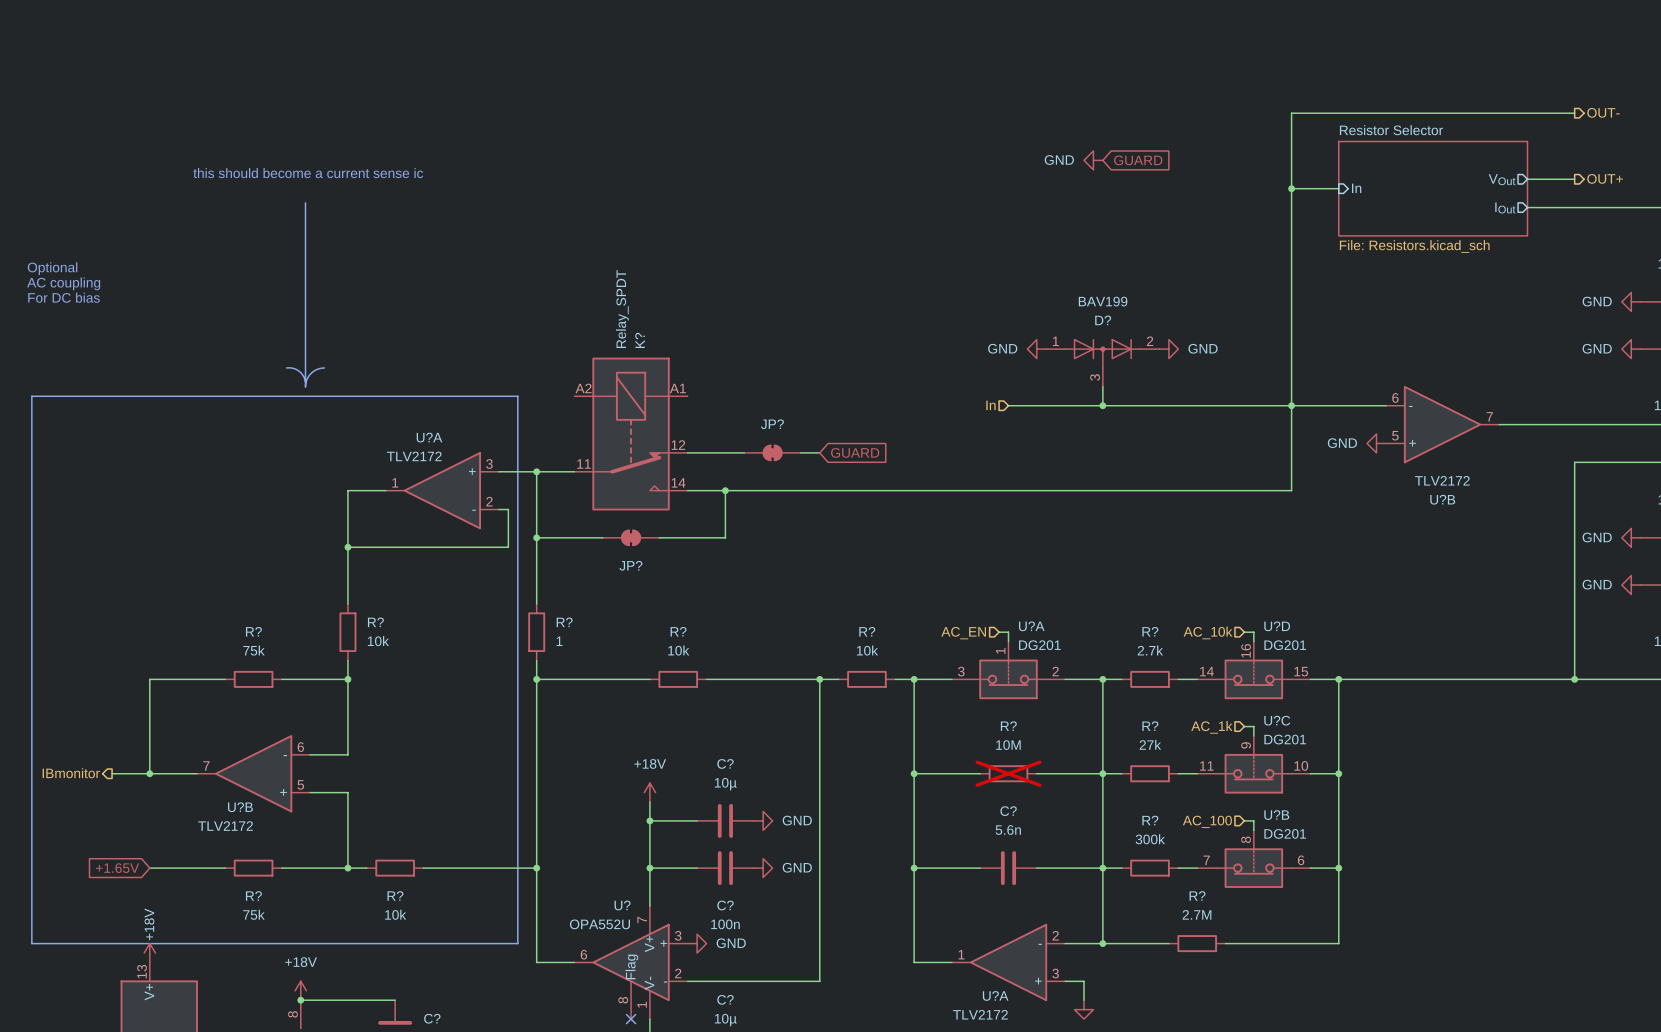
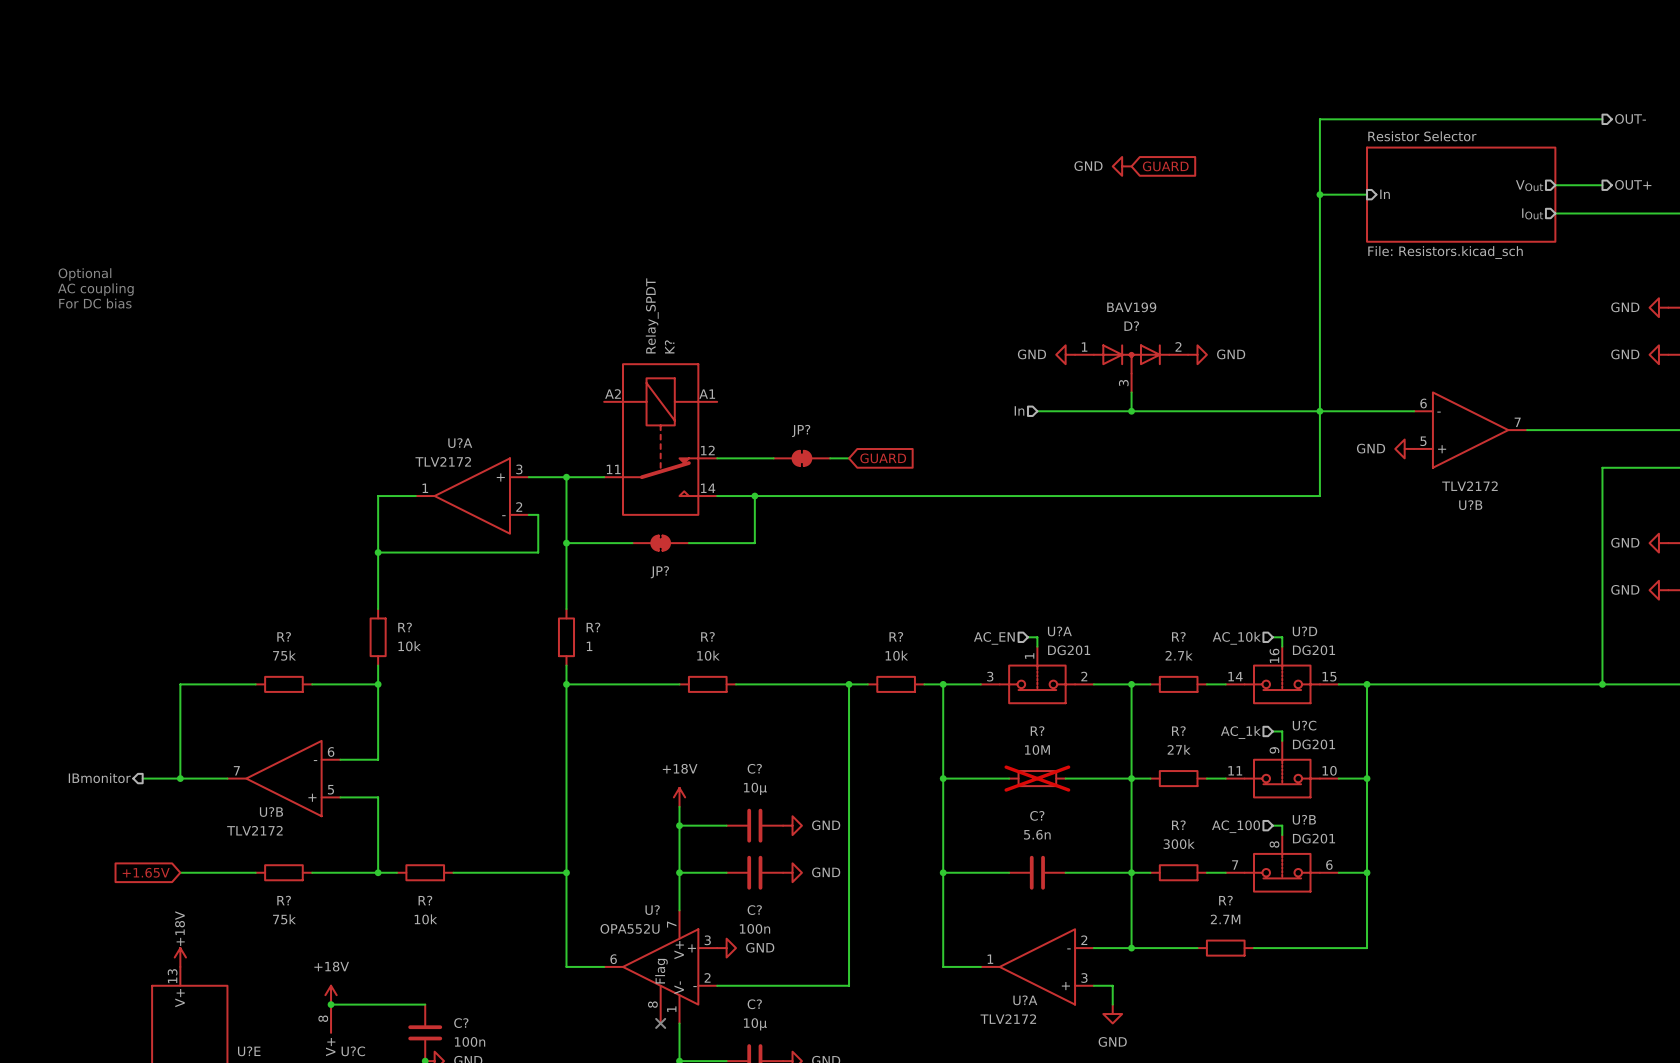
text: this should become a current sense ic (308, 173) -> none
line: (305, 202) (305, 386) (311, 373) (324, 367) -> none
line: (286, 367) (298, 371) (305, 382) -> none
line: (31, 396) (517, 396) (517, 943) (31, 943) (31, 396) -> none

